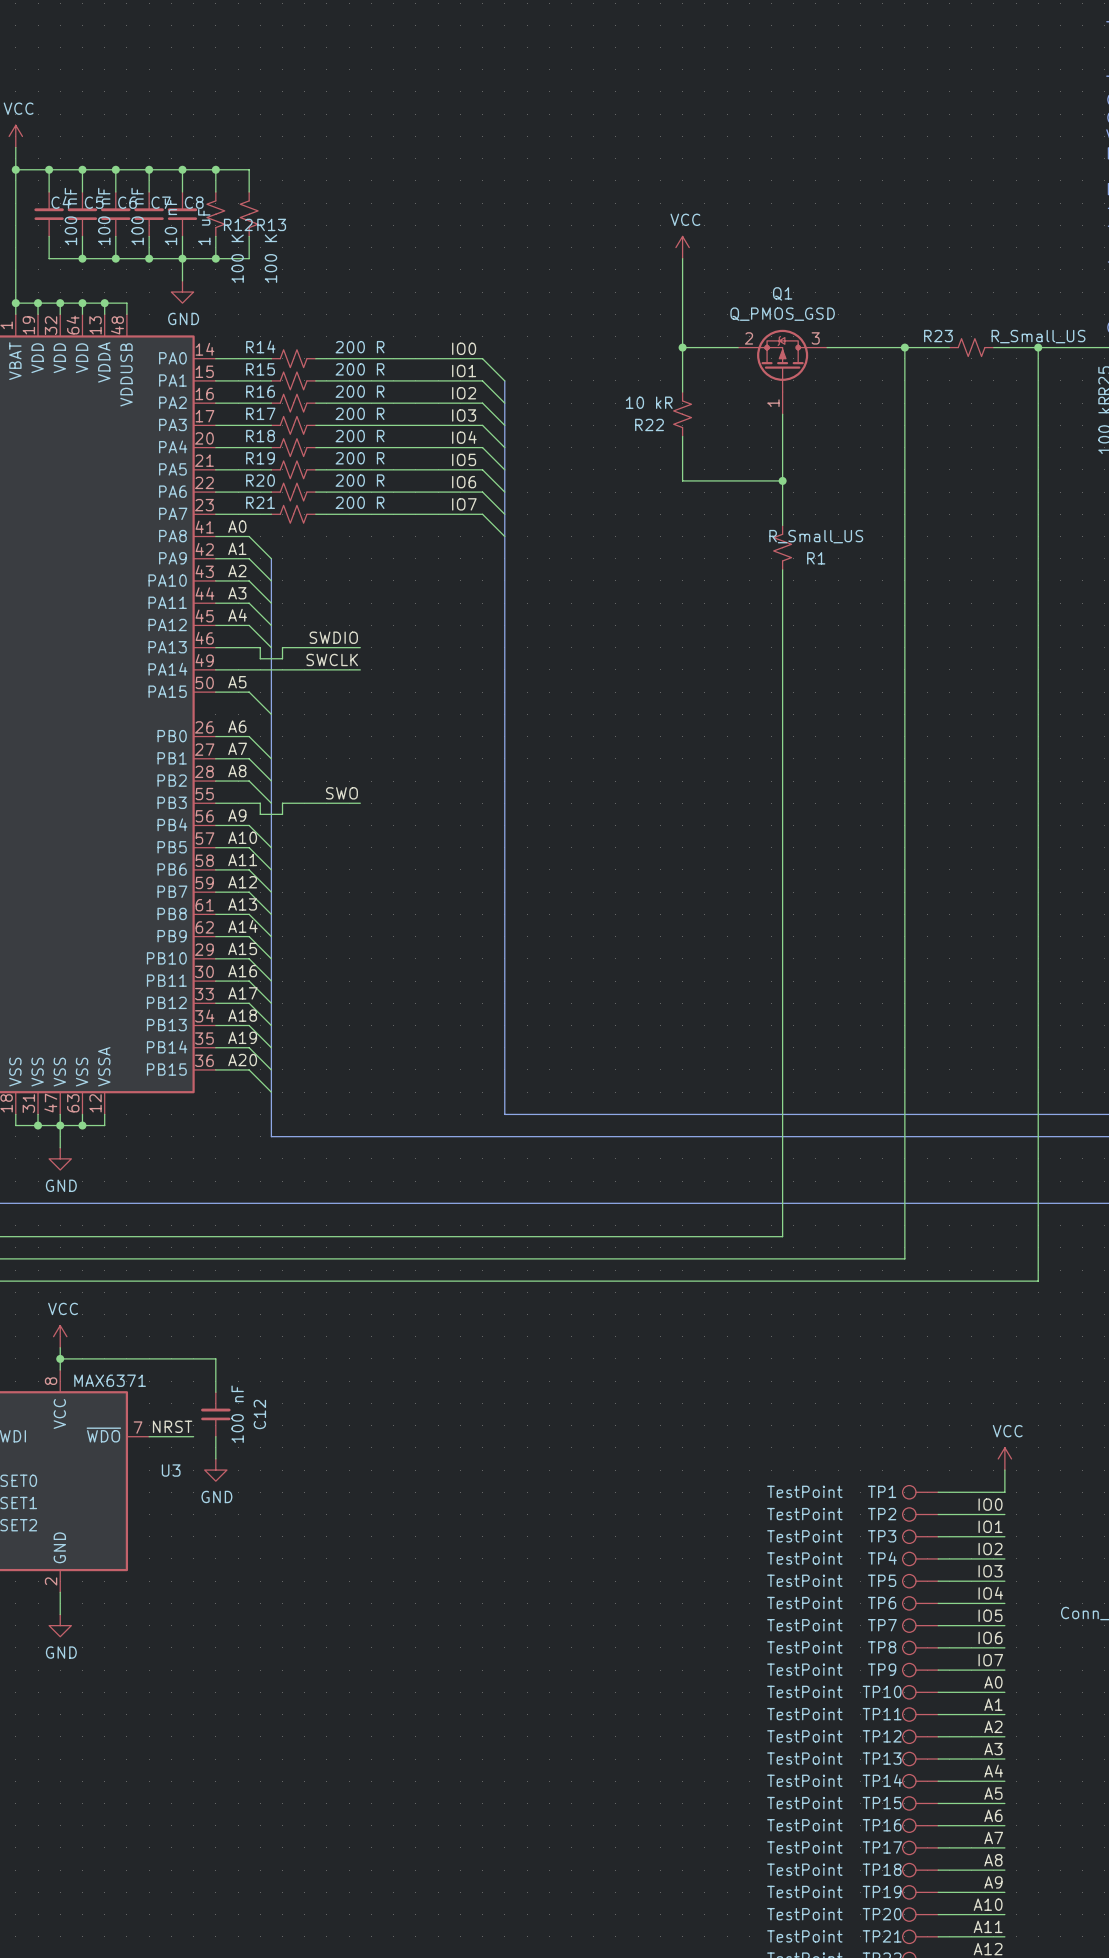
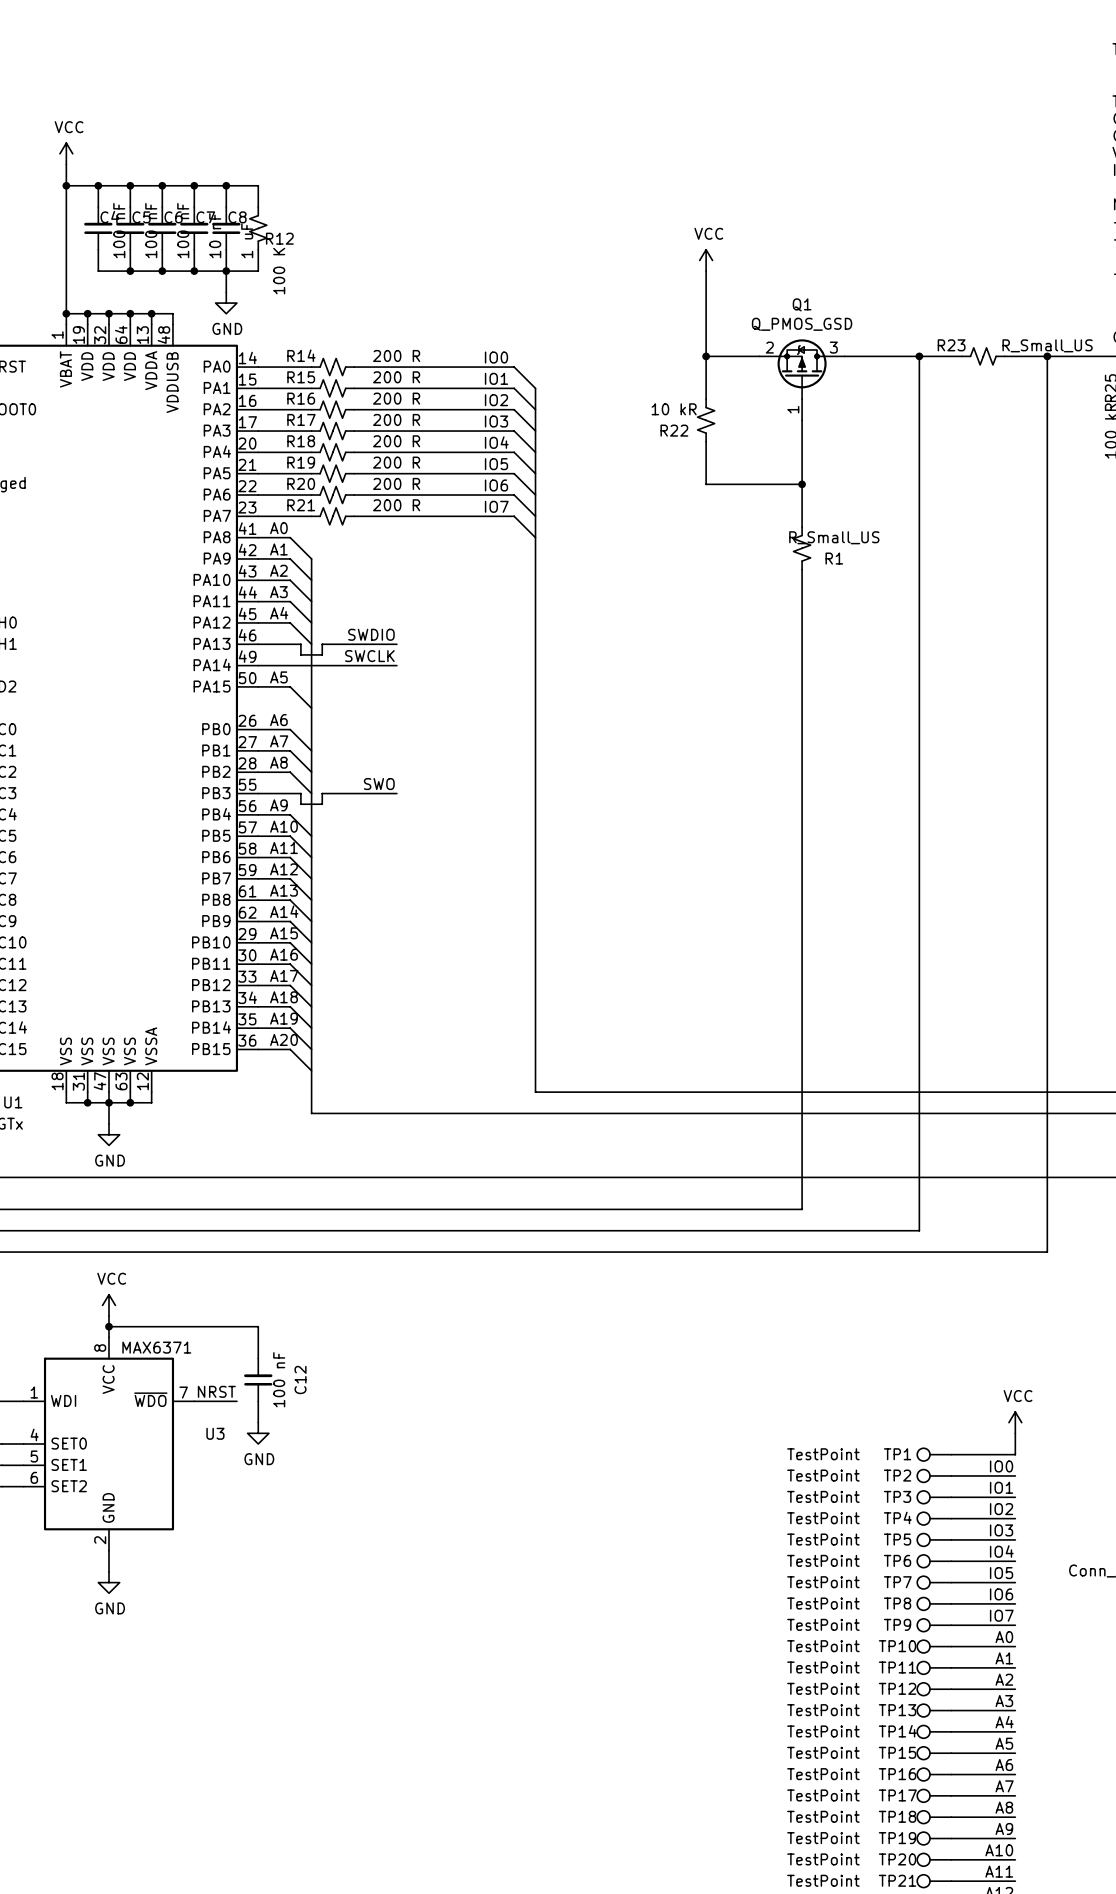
wire: (215, 169) (249, 169) (249, 192) -> none
junction: (215, 169) -> none
R13: 100 K (249, 214) -> none
wire: (249, 236) (249, 258) (215, 258) -> none
junction: (215, 258) -> none

